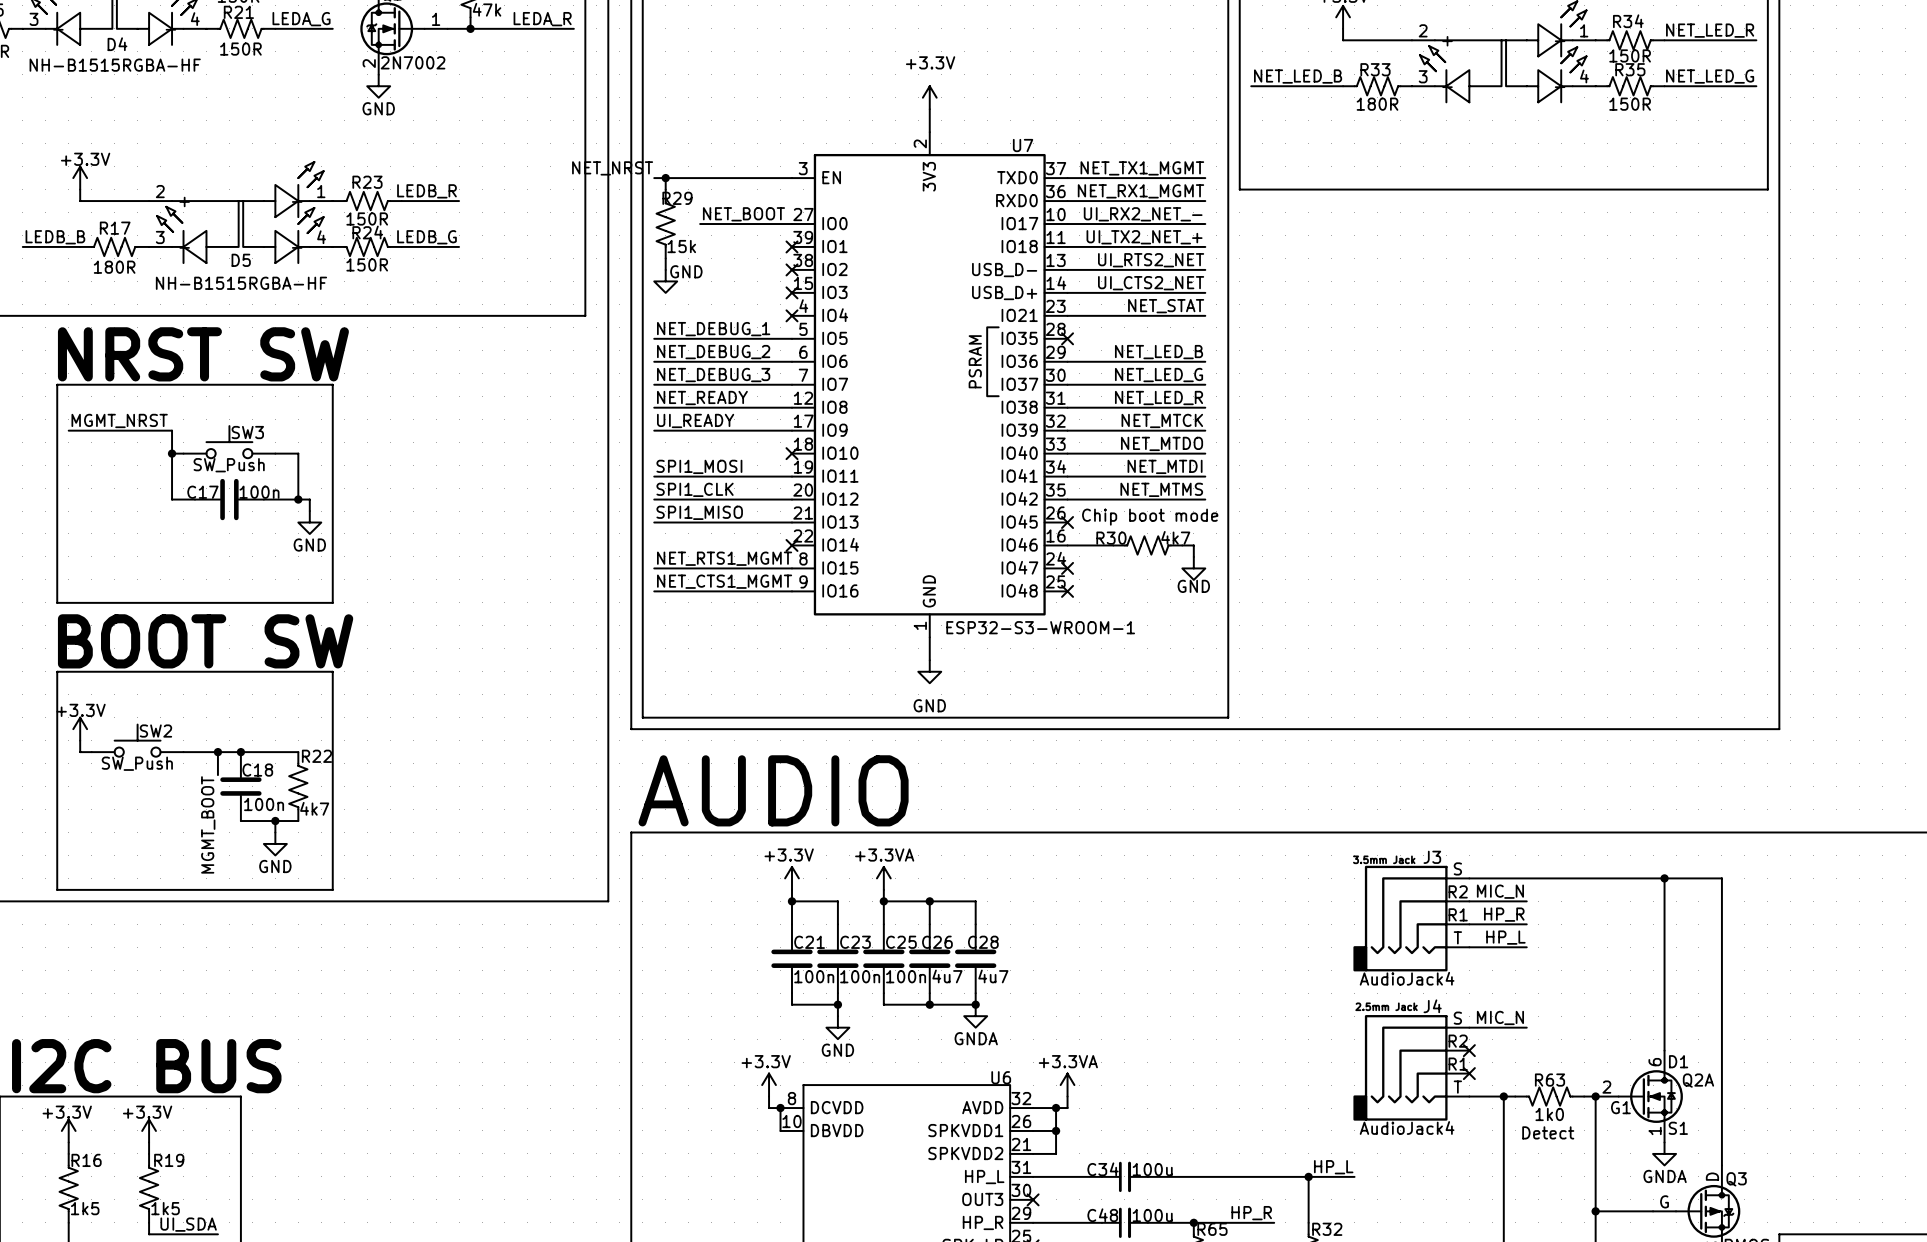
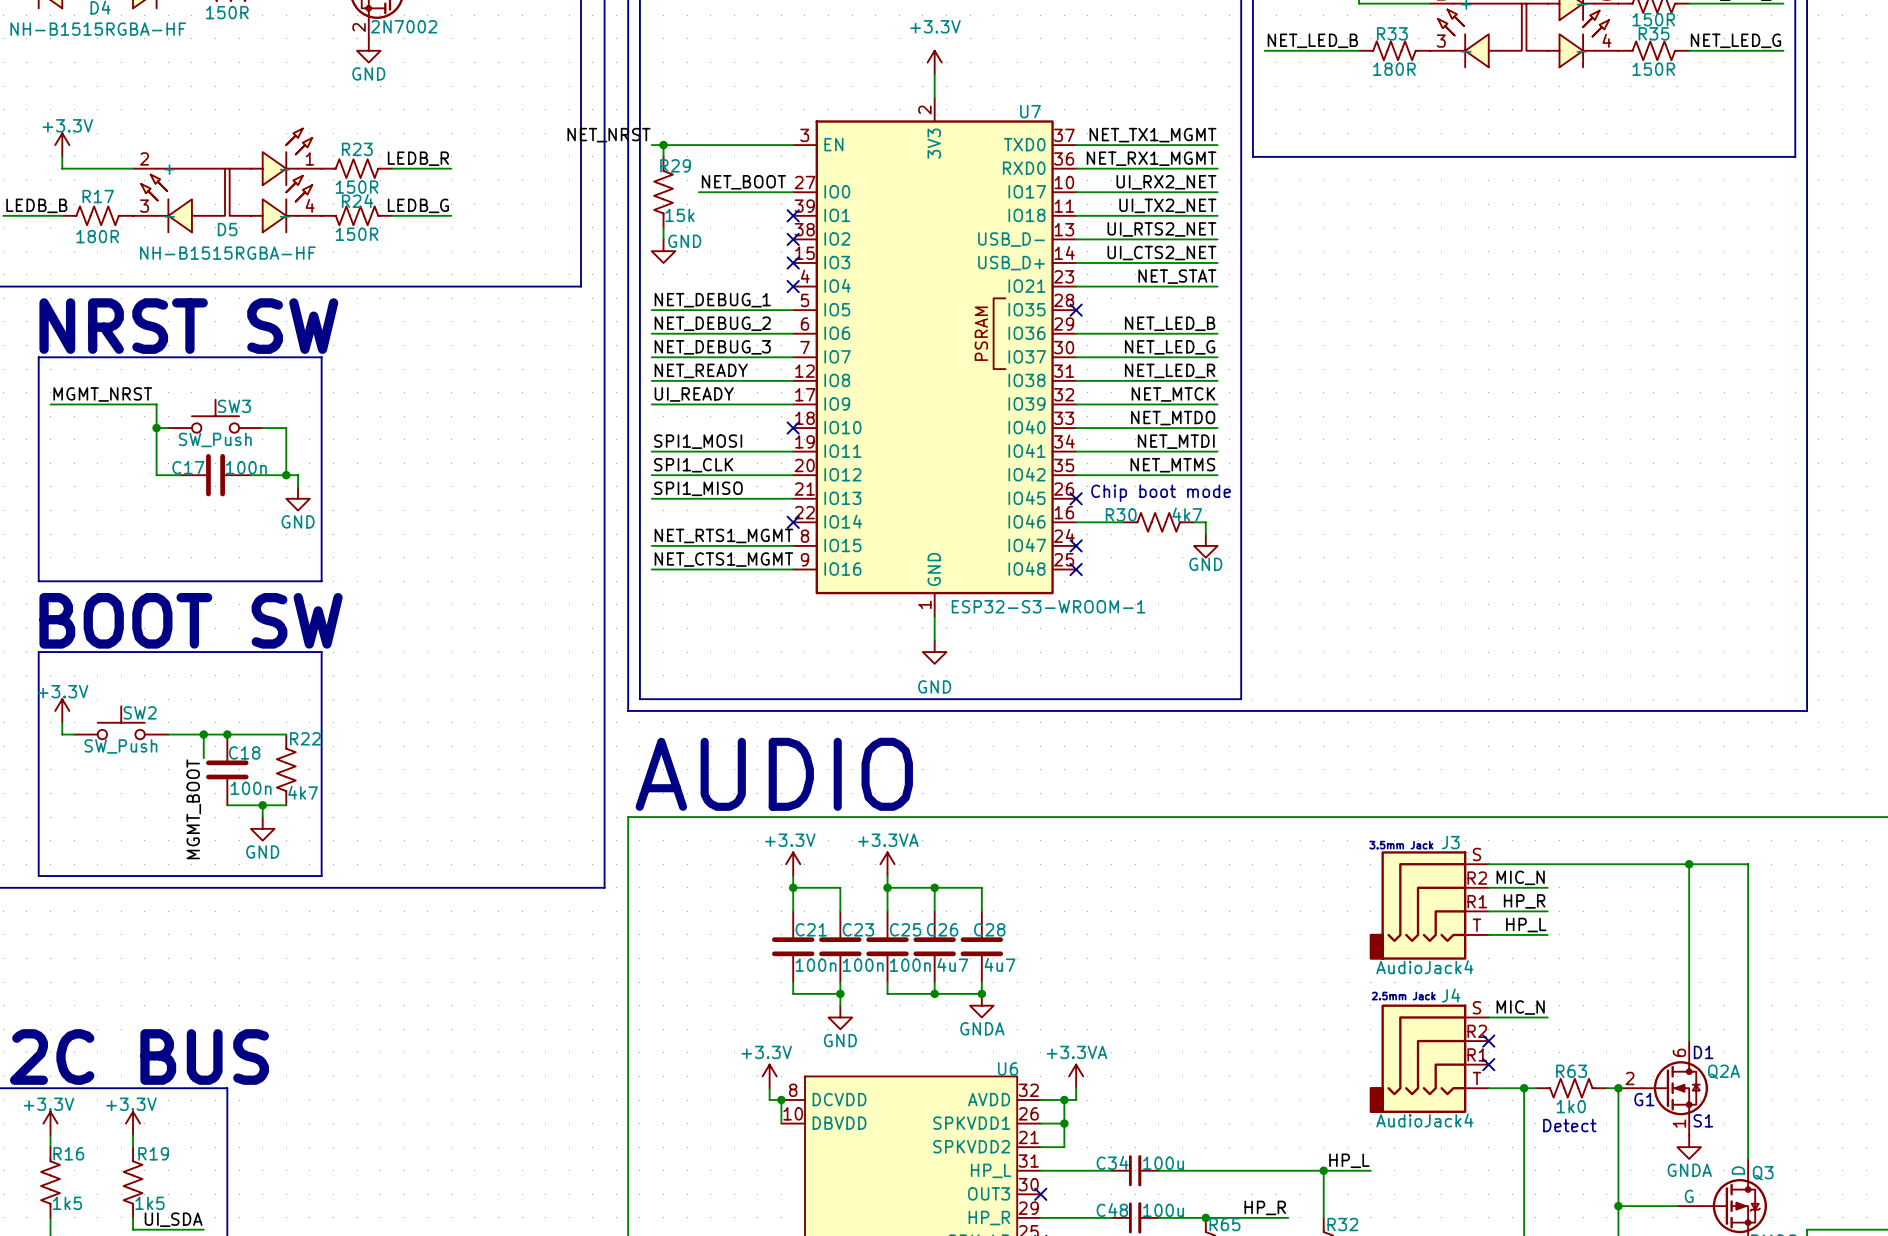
label: UI_RX2_NET_- (1143, 214) -> UI_RX2_NET (1166, 182)
label: UI_TX2_NET_+ (1144, 237) -> UI_TX2_NET (1167, 205)

